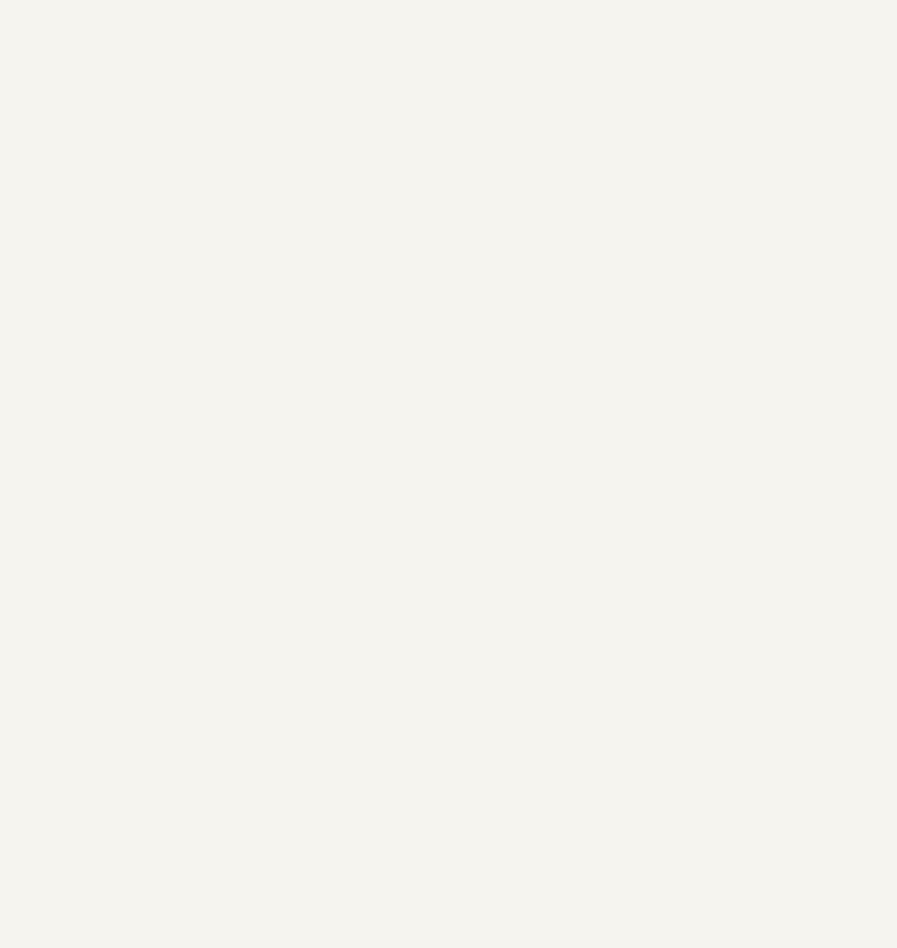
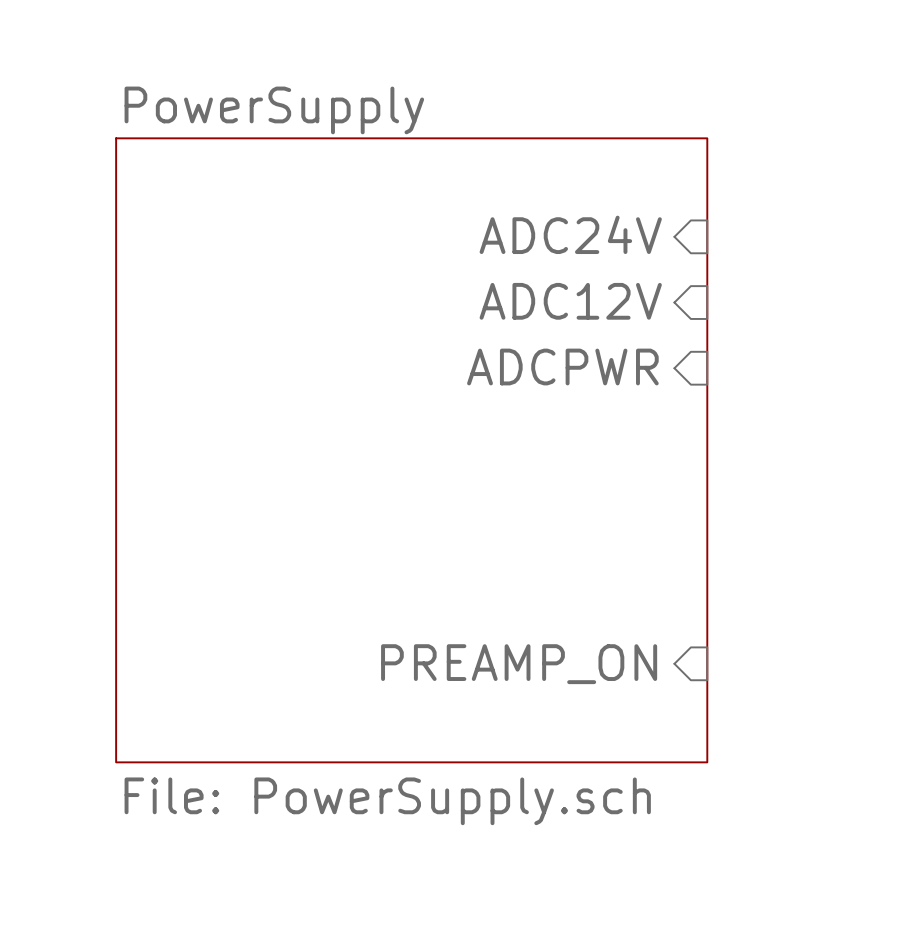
sheet pin: none -> ADC24V (570, 234)
sheet pin: none -> ADC12V (570, 301)
sheet pin: none -> ADCPWR (562, 367)
sheet PowerSupply: none -> File: PowerSupply.sch (411, 450)
sheet pin: none -> PREAMP_ON (519, 664)

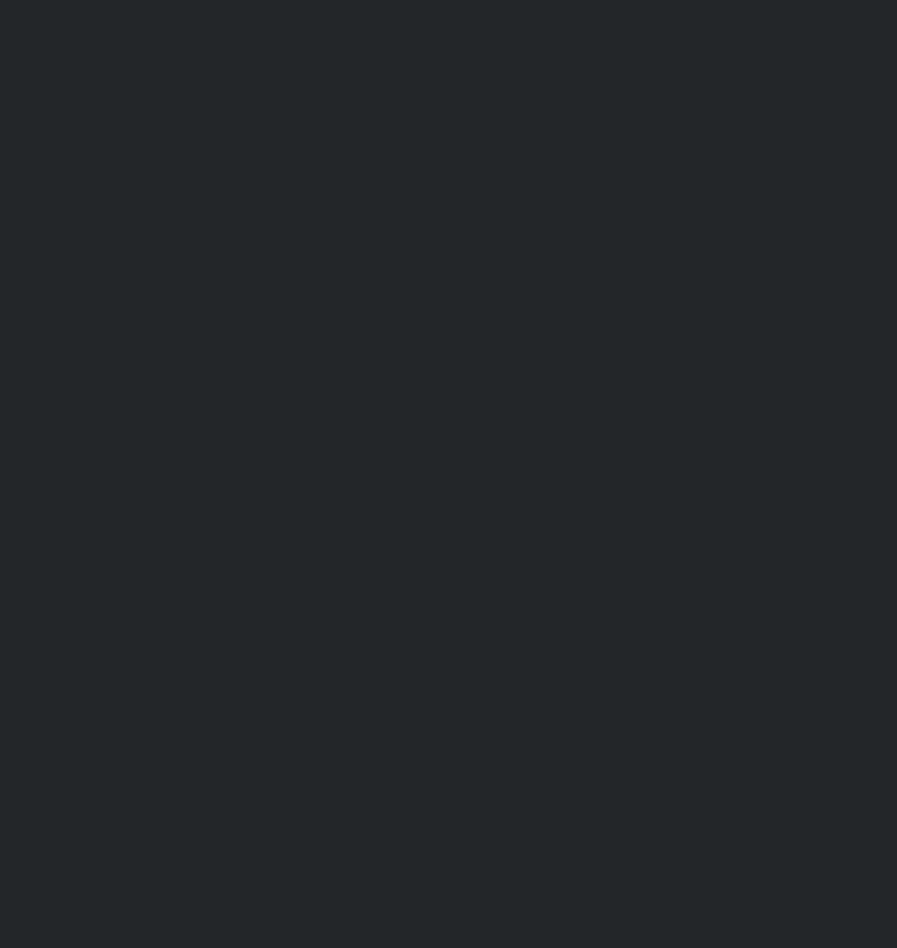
sheet pin: ADC24V (570, 234) -> none
sheet pin: ADC12V (570, 301) -> none
sheet pin: ADCPWR (562, 367) -> none
sheet PowerSupply: File: PowerSupply.sch (411, 450) -> none
sheet pin: PREAMP_ON (519, 664) -> none

